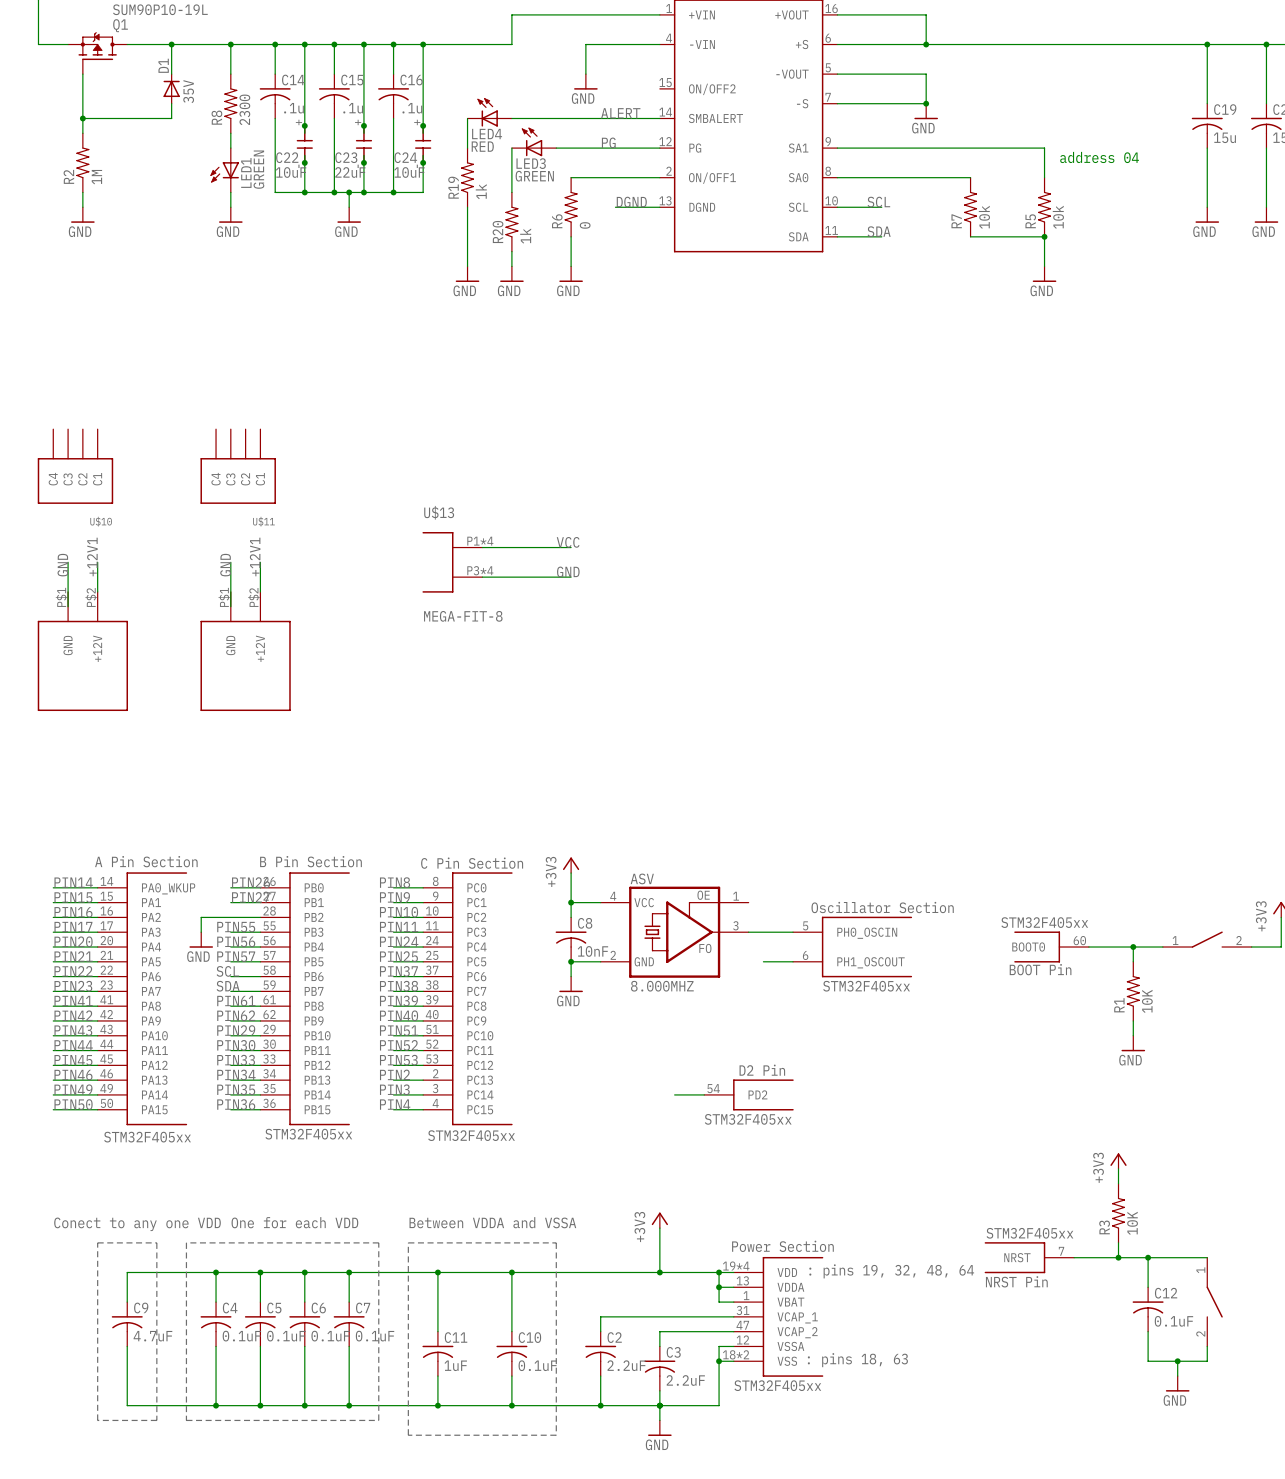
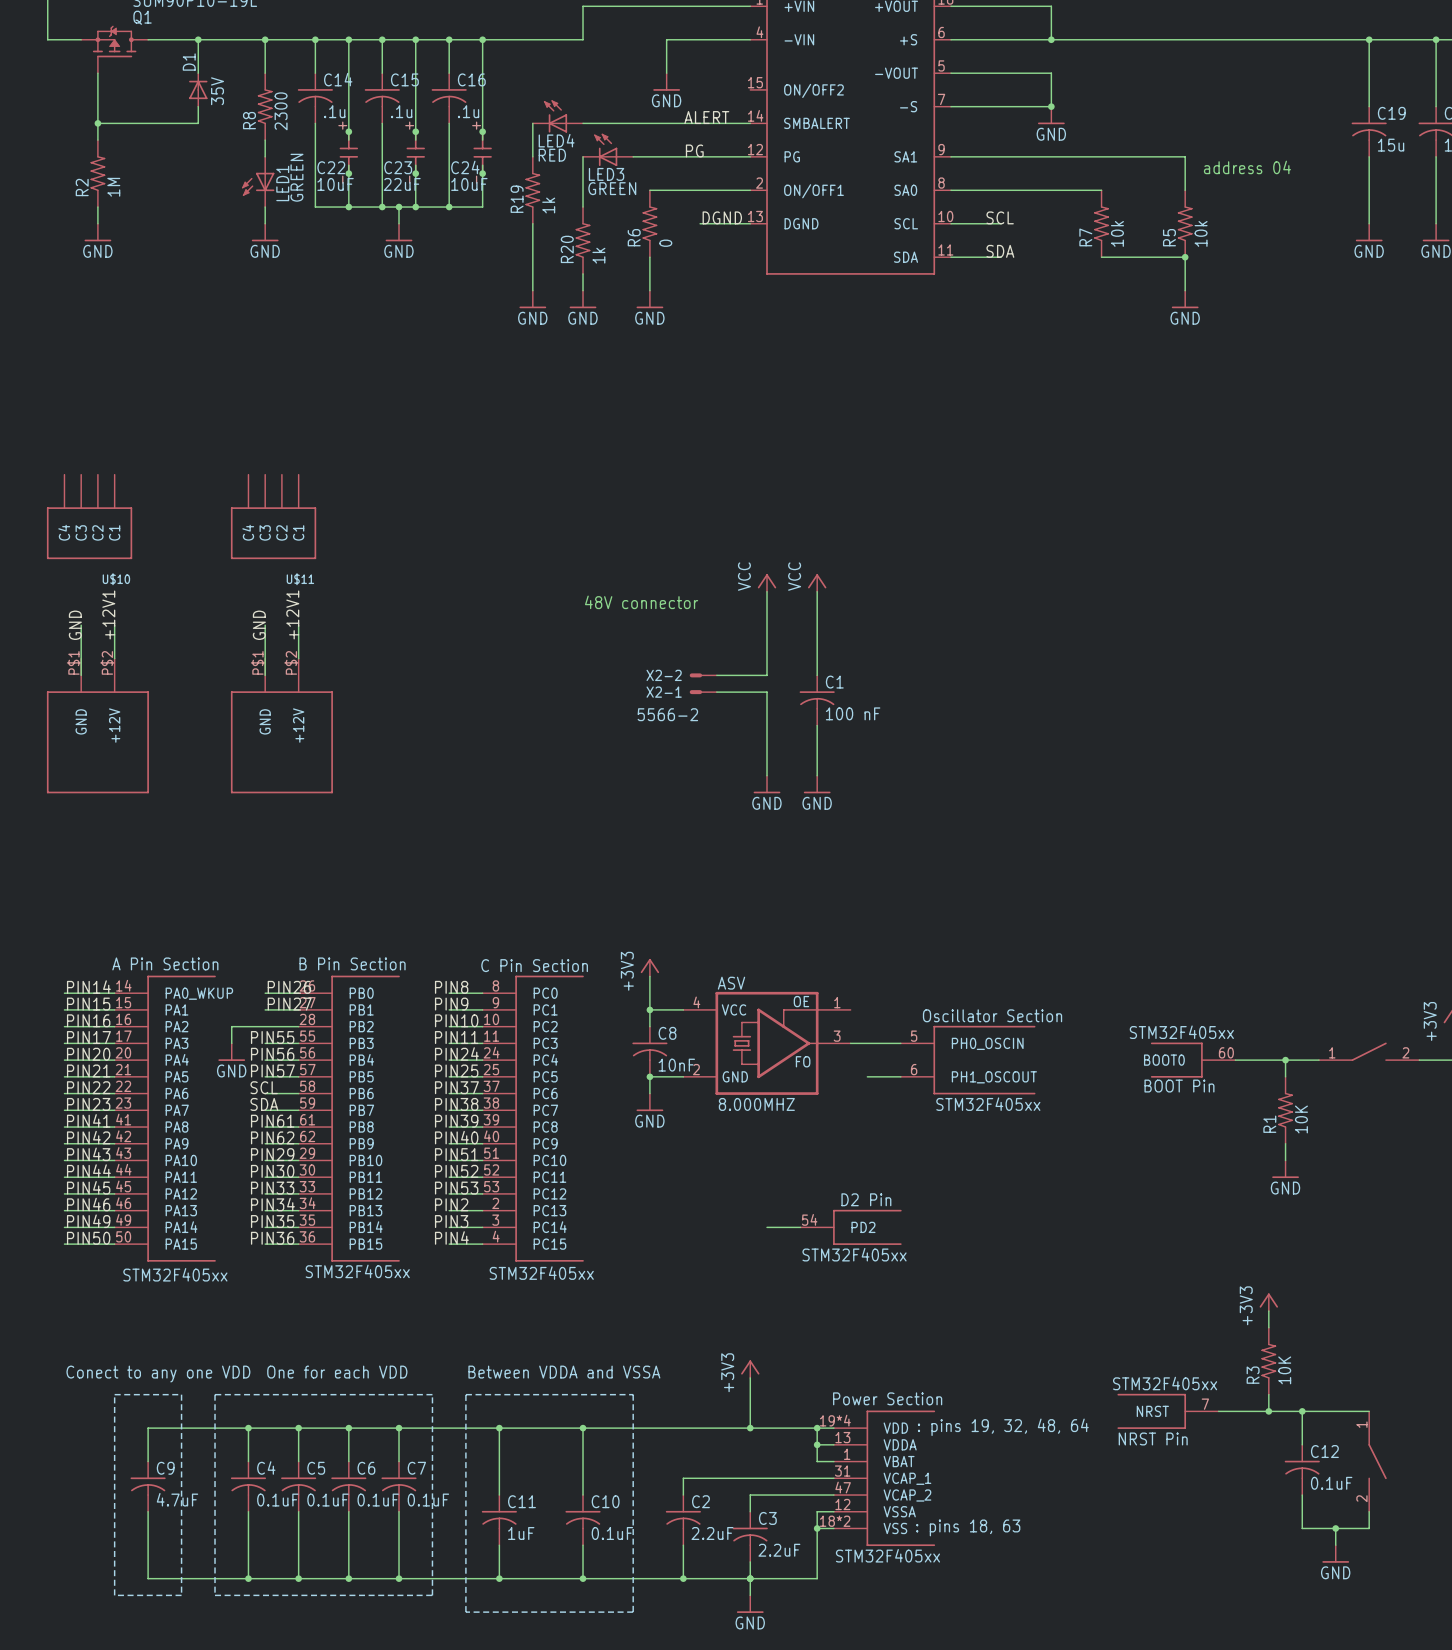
power symbol: none -> VCC (767, 582)
power symbol: none -> VCC (817, 582)
wire: none -> (767, 591) (767, 675) (716, 675)
wire: none -> (817, 591) (817, 675)
text: none -> 48V connector (641, 602)
label: VCC (568, 542) -> none
wire: (482, 547) (571, 547) -> none
U$13: MEGA-FIT-8 (452, 562) -> none
label: GND (568, 571) -> none
wire: (482, 577) (571, 577) -> none
X2-2: none -> (703, 675)
X2-1: none -> 5566-2 (703, 692)
wire: none -> (716, 692) (767, 692) (767, 775)
C1: none -> 100 nF (817, 700)
wire: none -> (817, 725) (817, 775)
power symbol: none -> GND (767, 784)
power symbol: none -> GND (817, 784)

